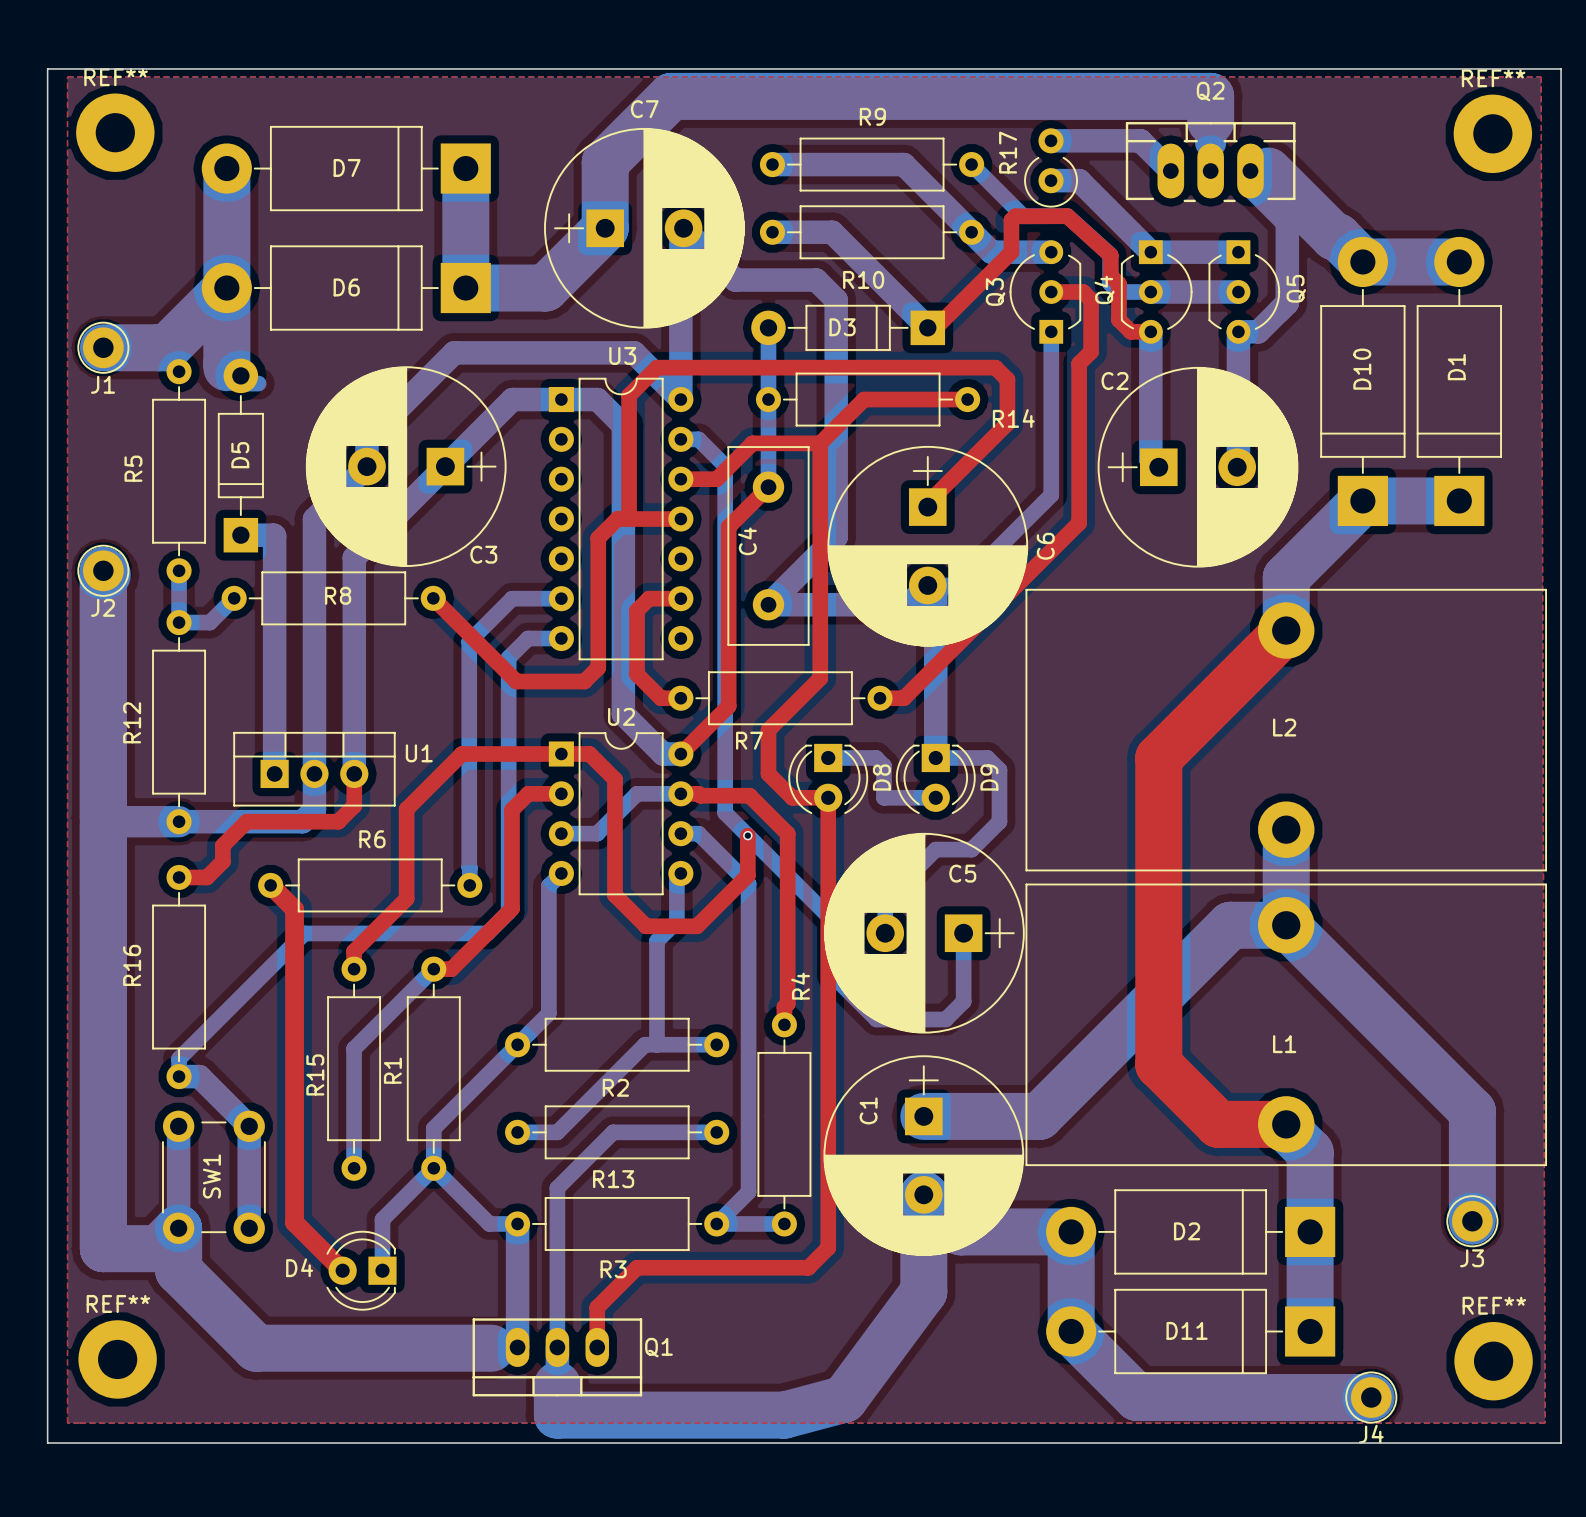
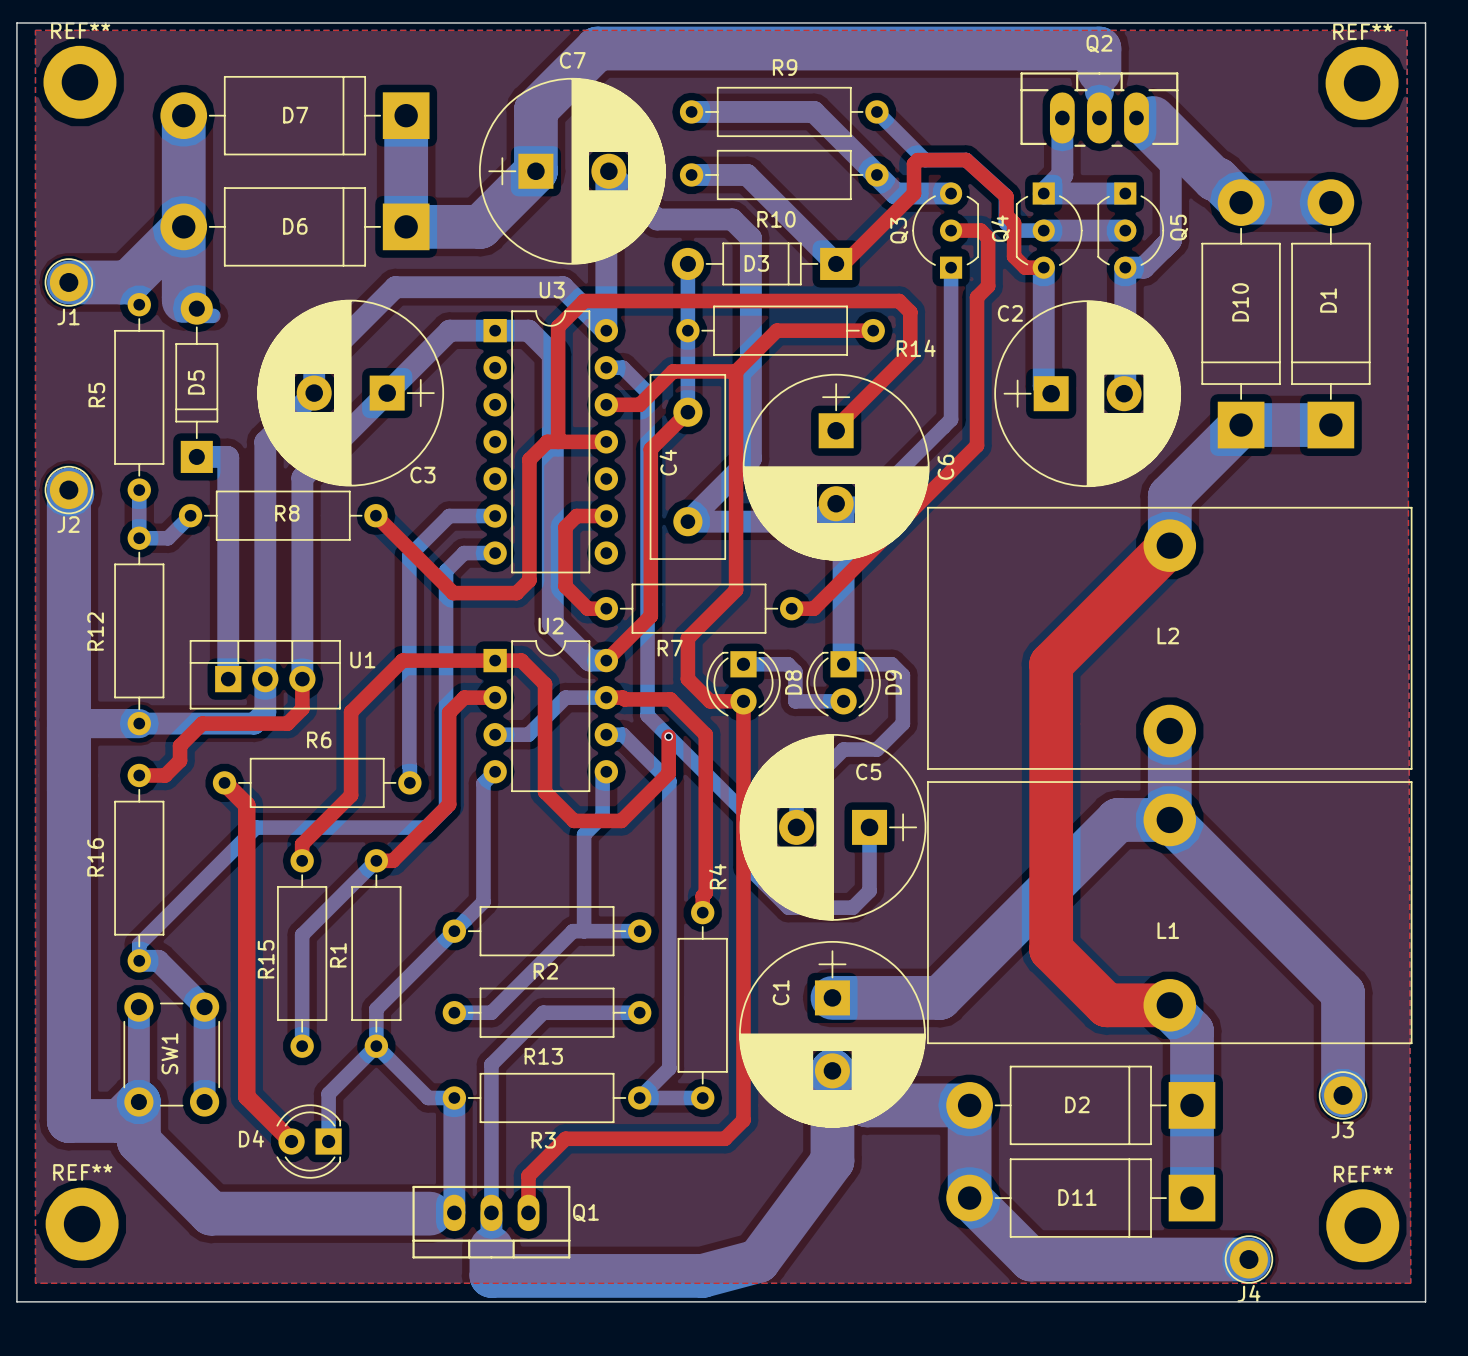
bottom track: (1051, 140) (1140, 140) (1170, 171) -> none
R17: (1051, 167) -> none
bottom track: (1051, 180) (1079, 180) (1150, 252) -> (1062, 117) (1062, 174) (1043, 193)

